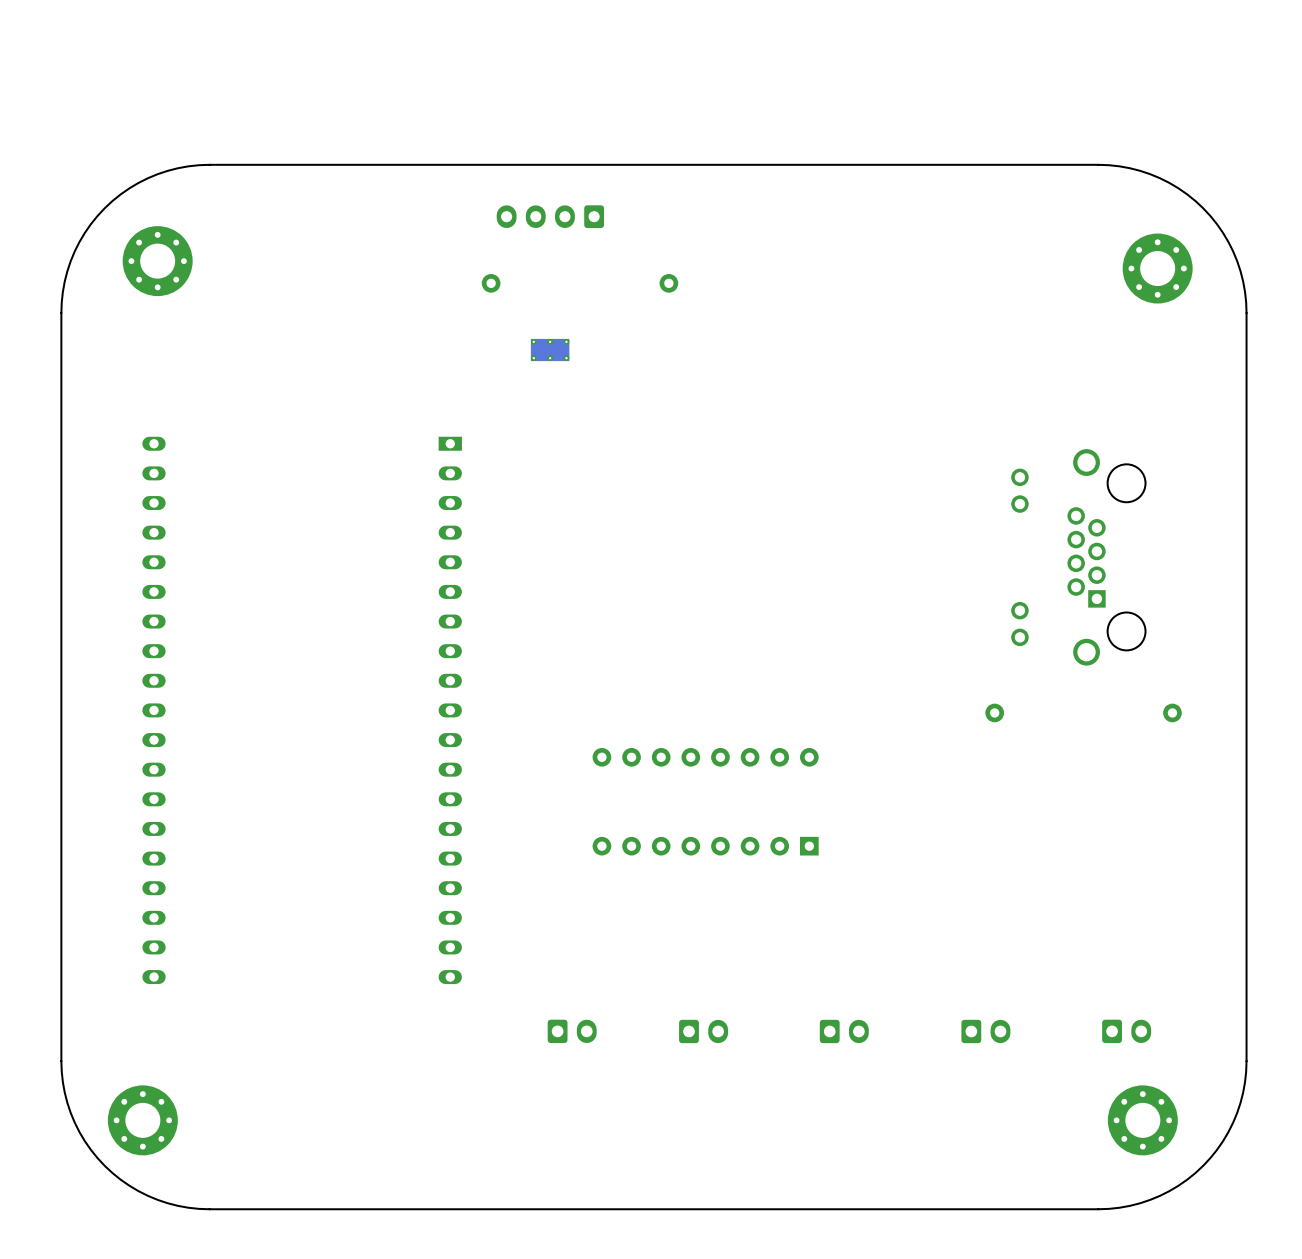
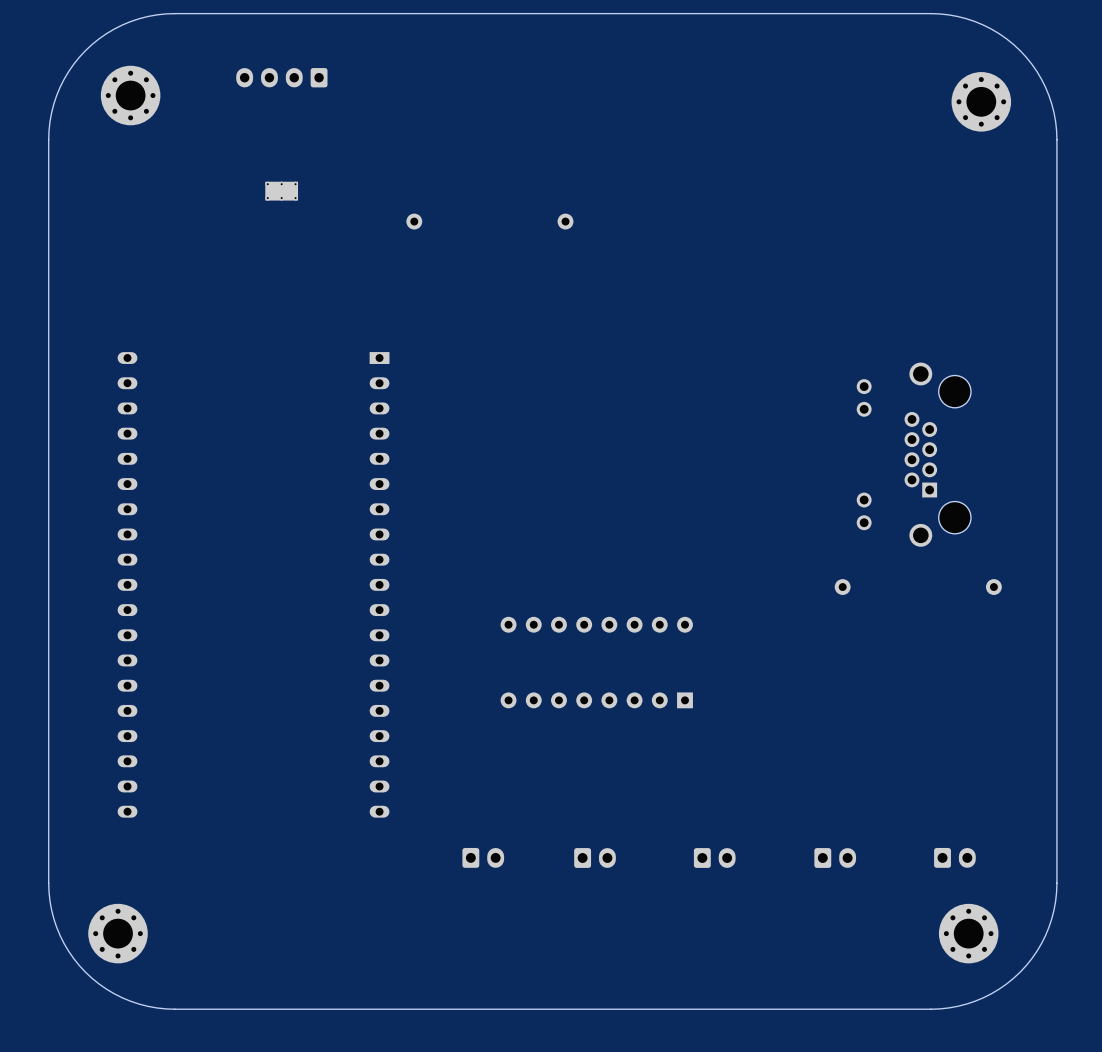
part position: (550, 216) -> (281, 77)
part position: (157, 261) -> (130, 95)
part position: (1157, 268) -> (981, 101)
board edge: (1246, 312) (1243, 281) (1233, 251) (1223, 232) (1203, 208) (1187, 194) (1159, 178) (1129, 168) (1098, 164) (188, 166) (167, 170) (138, 182) (112, 201) (97, 215) (84, 232) (70, 261) (64, 281) (61, 312) -> (1056, 246) (1056, 130) (1051, 104) (1041, 79) (1020, 50) (991, 29) (966, 18) (930, 13) (174, 13) (139, 18) (114, 29) (92, 44) (73, 64) (56, 95) (49, 130) (48, 246)
part position: (550, 350) -> (281, 191)

